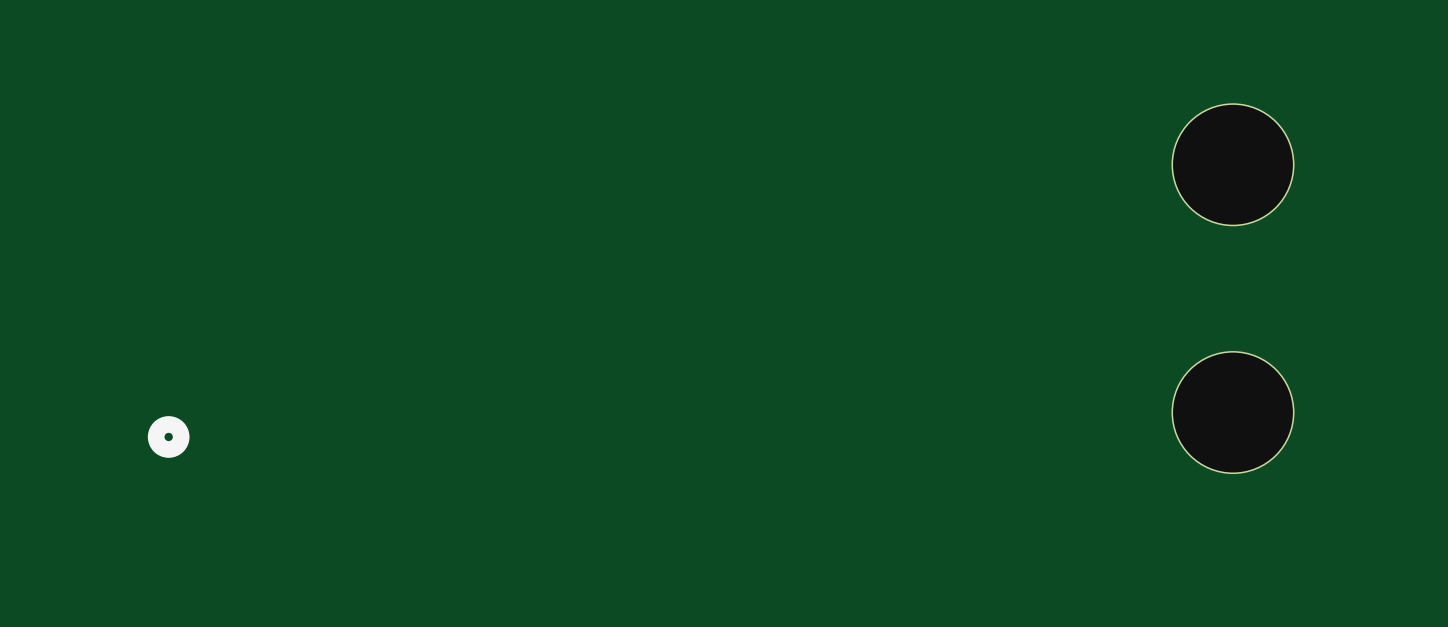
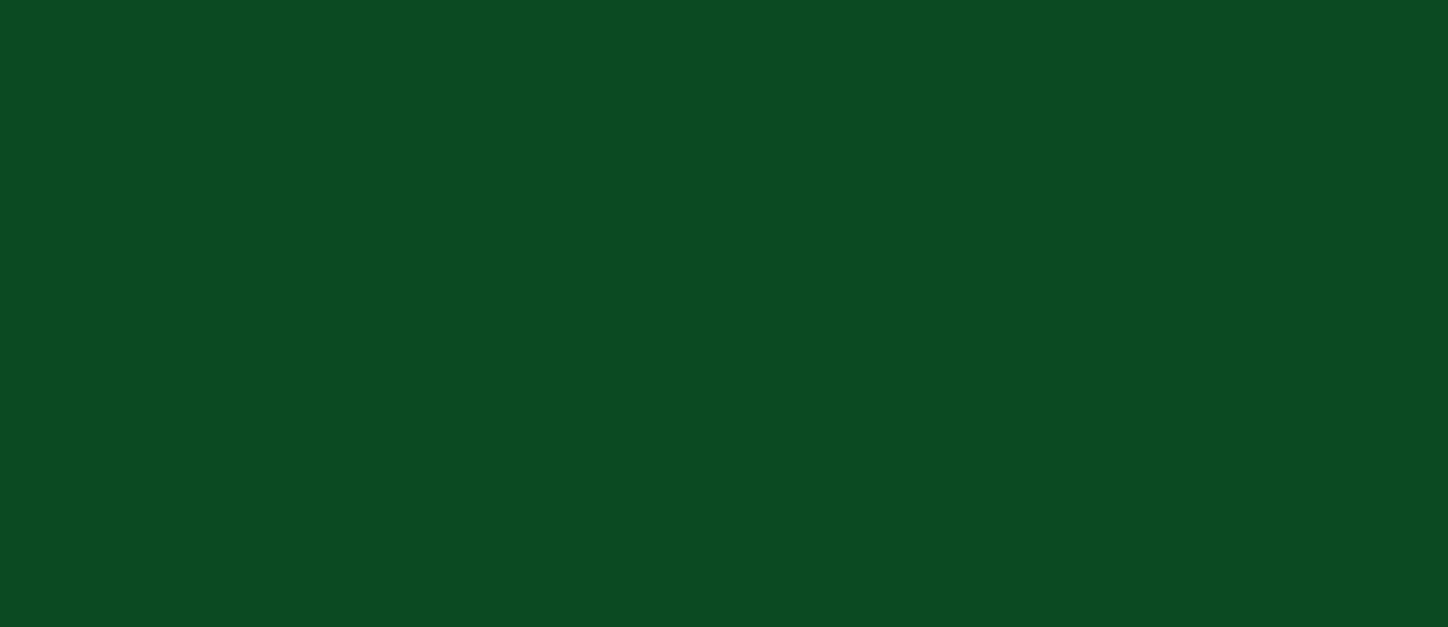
part: (1232, 164) -> none
part: (1232, 412) -> none
part: (168, 436) -> none

